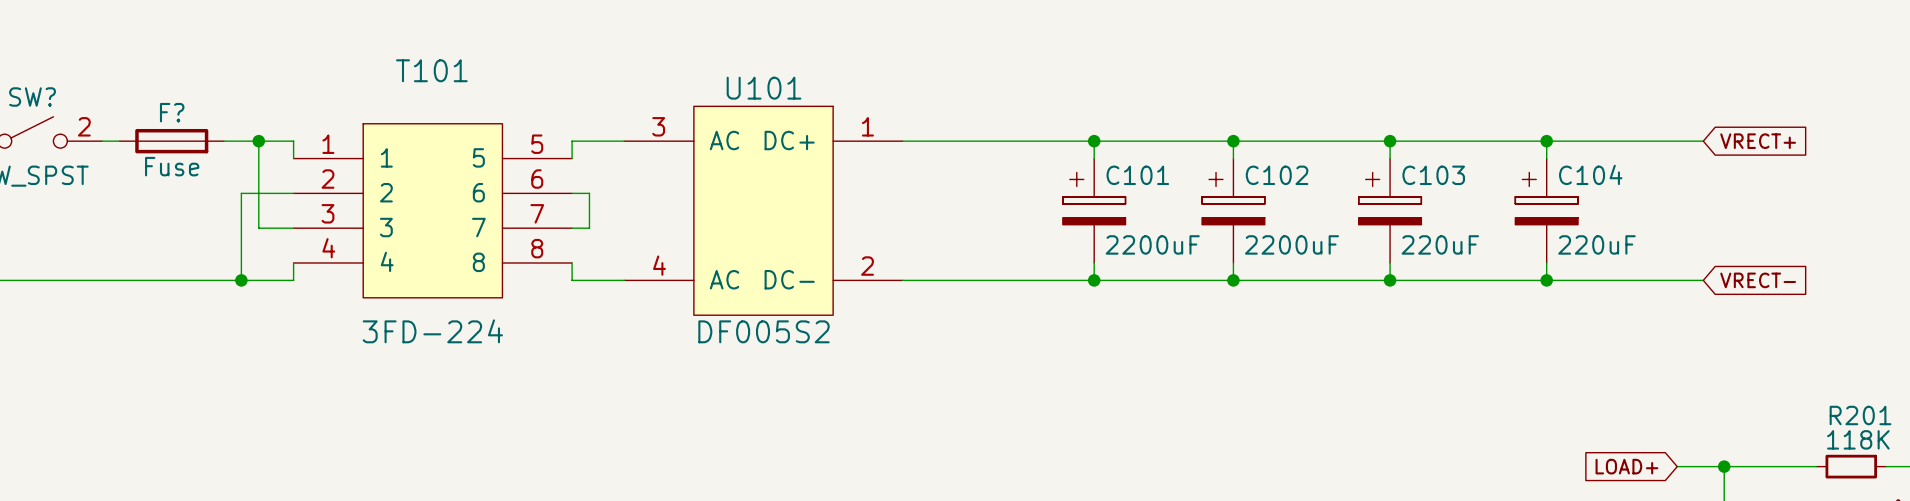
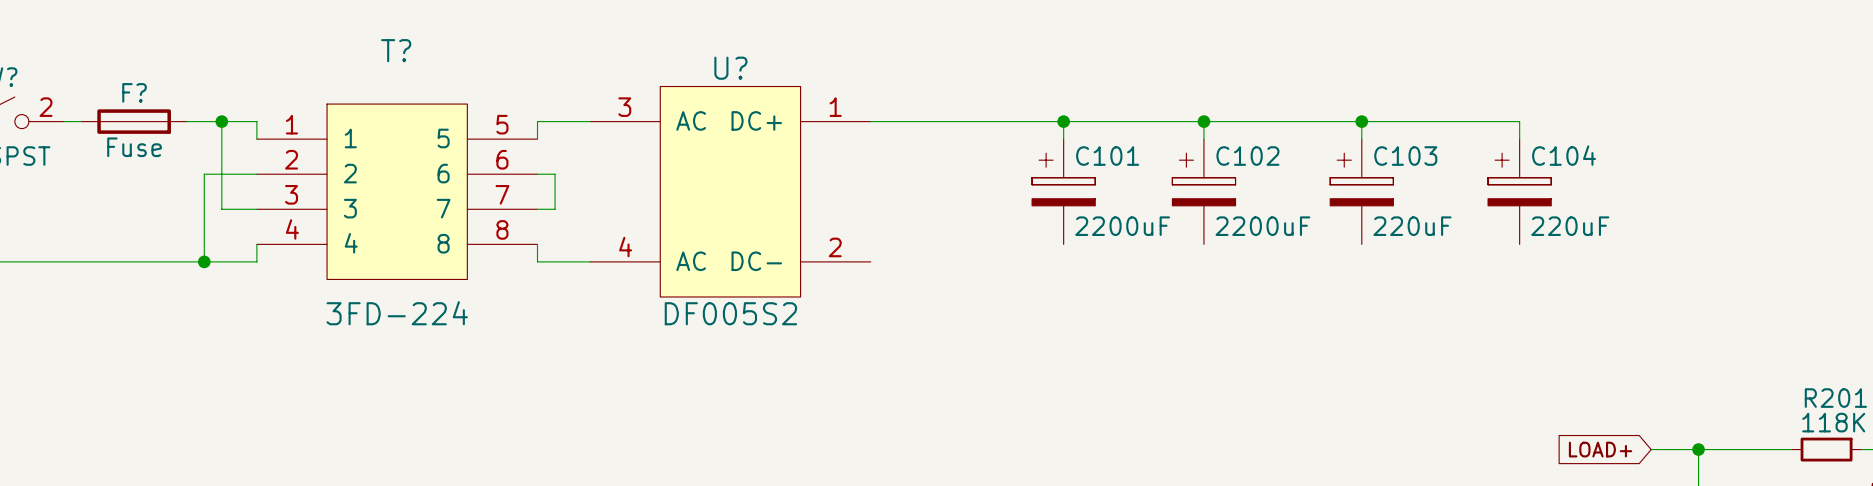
T101 name: T101 (431, 70) -> T? (396, 50)
U101 name: U101 (764, 88) -> U? (730, 68)
wire: (1546, 141) (1703, 141) -> none
junction: (1546, 141) -> none
global label: VRECT+ (1758, 141) -> none
wire: (1094, 262) (1094, 280) -> none
wire: (1233, 262) (1233, 280) -> none
wire: (1390, 262) (1390, 280) -> none
wire: (1546, 262) (1546, 280) -> none
wire: (902, 280) (1703, 280) -> none
junction: (1094, 280) -> none
junction: (1233, 280) -> none
junction: (1390, 280) -> none
junction: (1546, 280) -> none
global label: VRECT- (1758, 280) -> none

